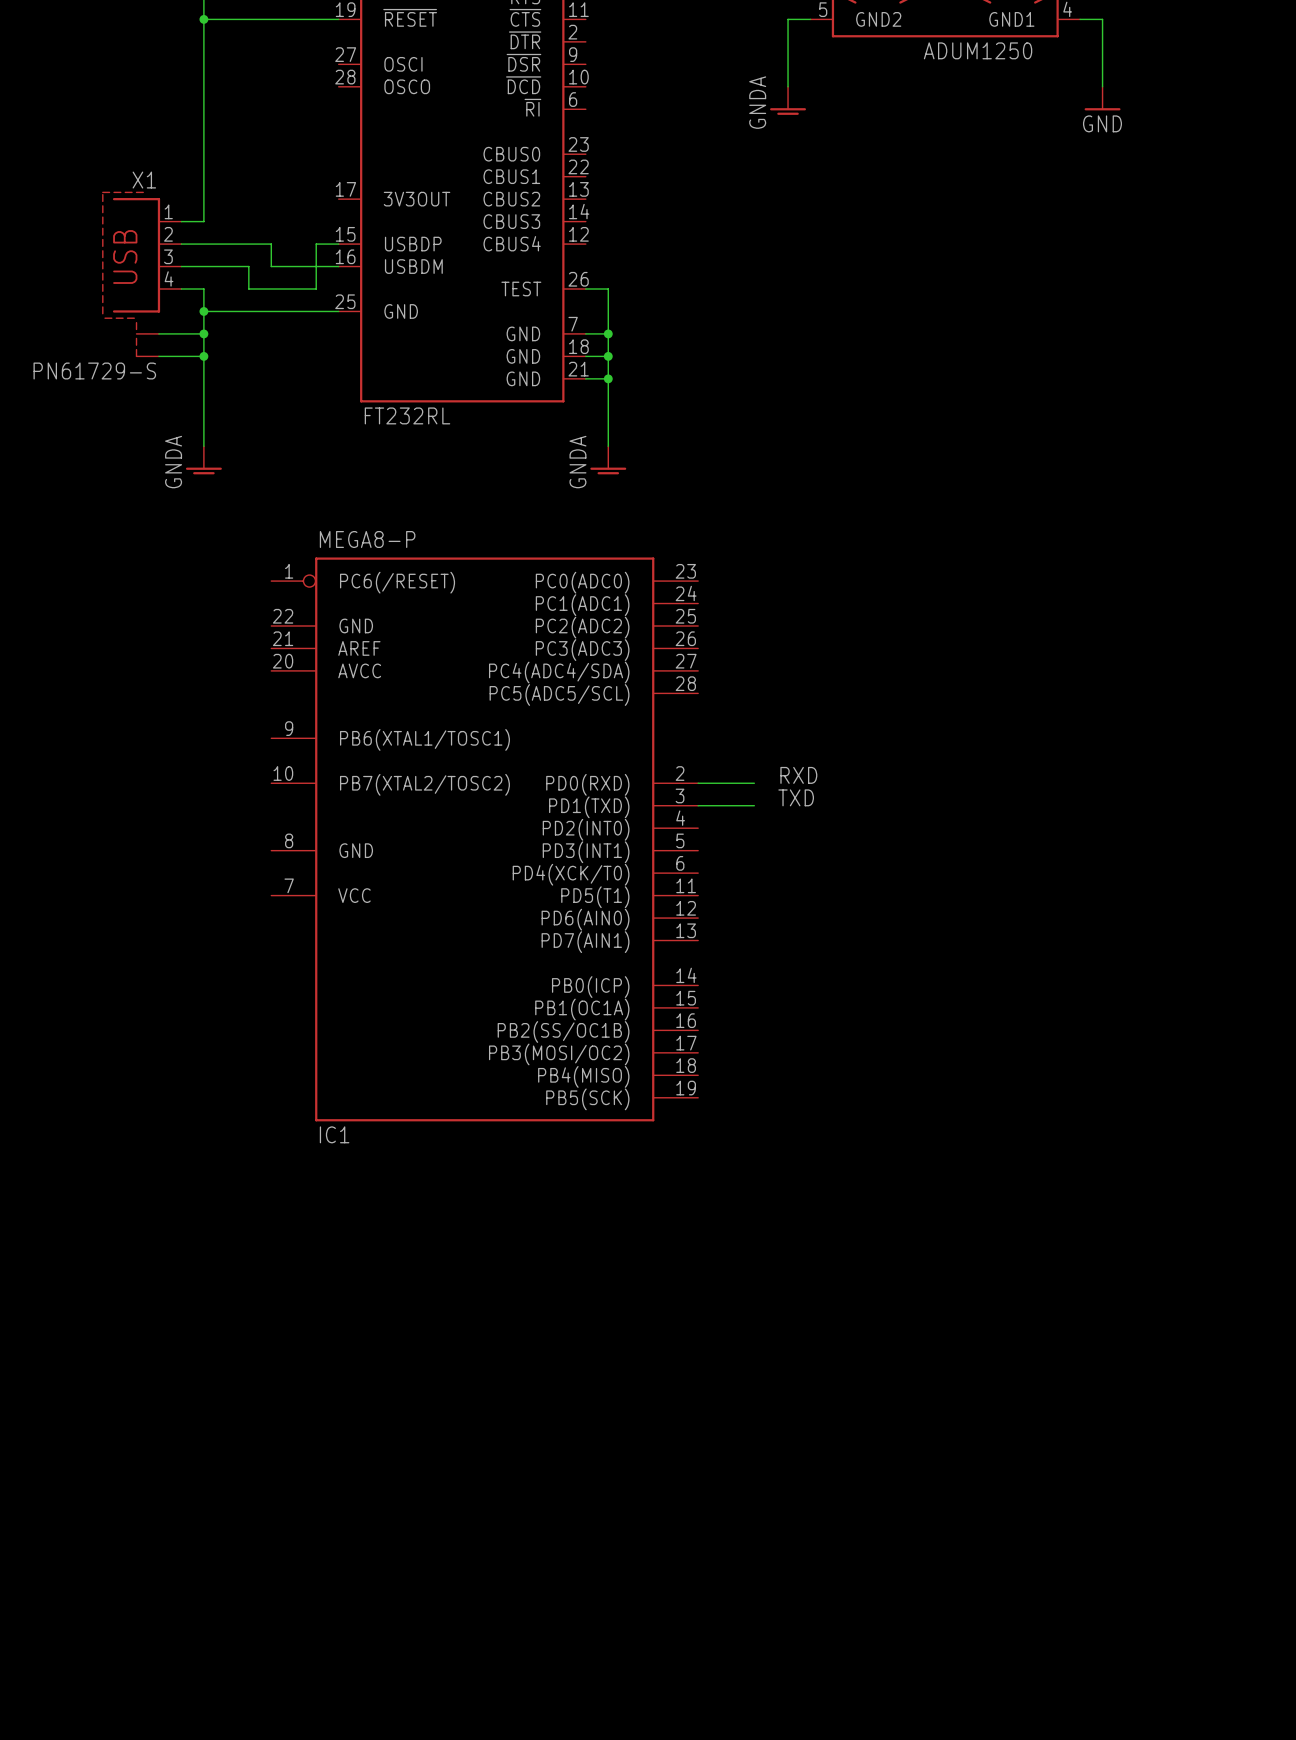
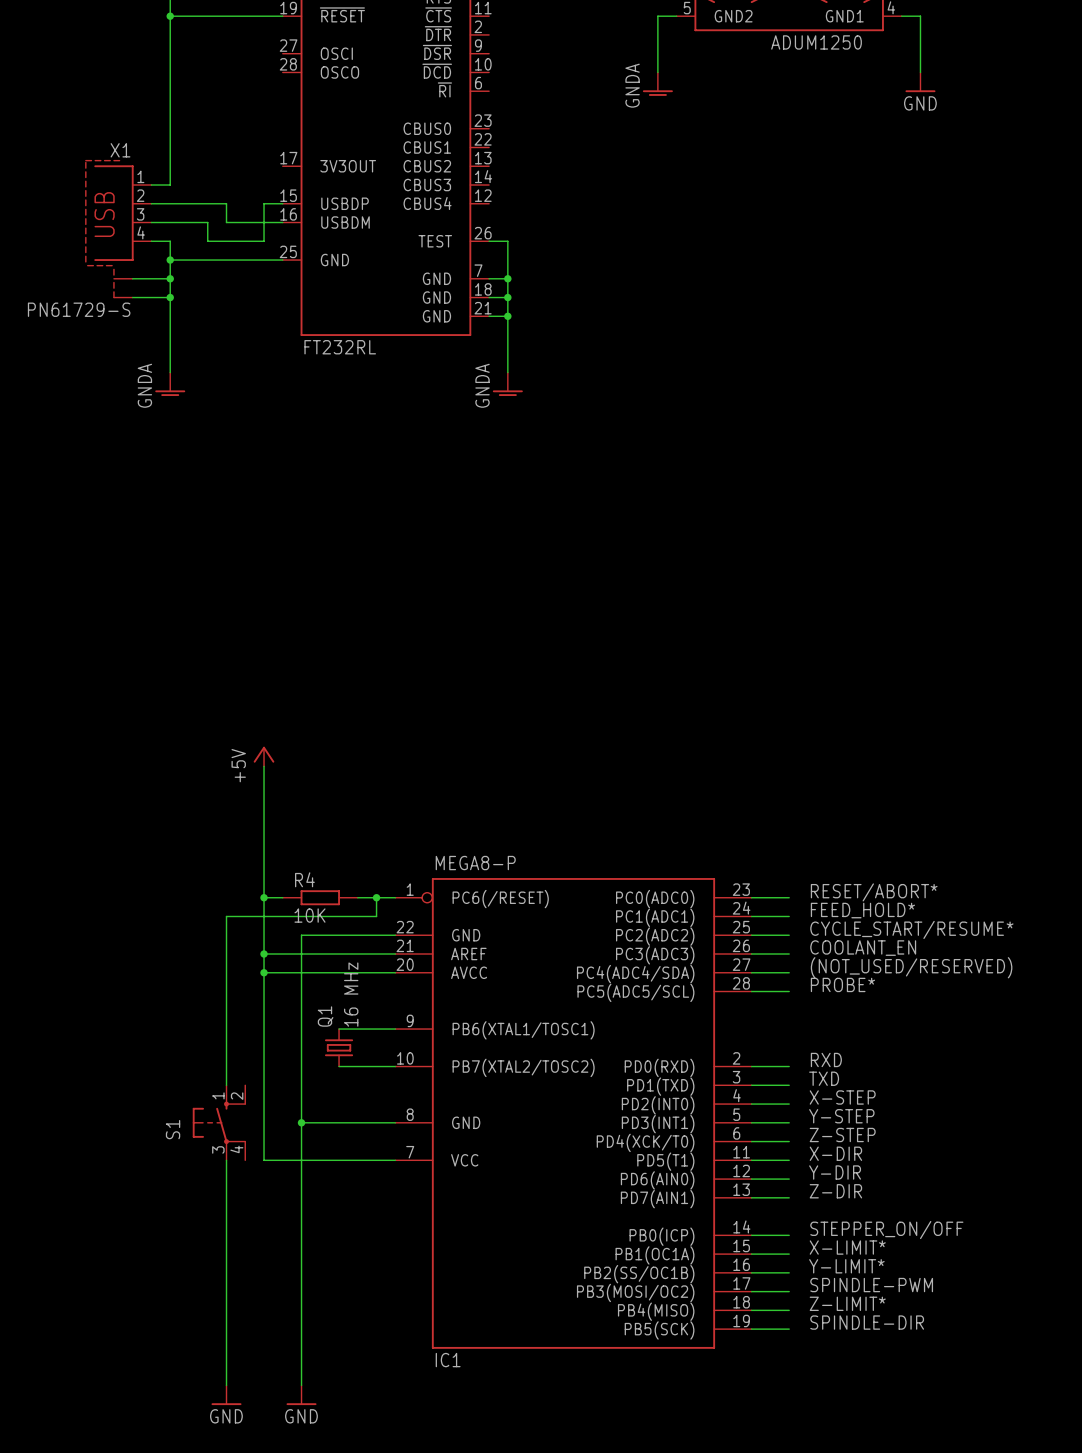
label: RXD (798, 775) -> none
wire: (698, 783) (754, 783) -> none
label: TXD (796, 797) -> none
wire: (698, 805) (754, 805) -> none
IC1 position: (484, 839) -> (573, 1113)
power symbol: none -> +5V (264, 756)
wire: none -> (264, 766) (264, 1160) (395, 1160)
label: none -> RESET/ABORT* (874, 892)
wire: none -> (264, 897) (282, 897)
junction: none -> (264, 897)
R4: none -> 10K (320, 897)
wire: none -> (357, 897) (395, 897)
wire: none -> (376, 897) (376, 916) (226, 916) (226, 1085)
junction: none -> (376, 897)
wire: none -> (751, 897) (789, 897)
label: none -> FEED_HOLD* (862, 910)
wire: none -> (751, 916) (789, 916)
label: none -> CYCLE_START/RESUME* (911, 929)
wire: none -> (395, 935) (301, 935) (301, 1385)
wire: none -> (751, 935) (789, 935)
label: none -> COOLANT_EN (863, 948)
wire: none -> (264, 954) (395, 954)
junction: none -> (264, 954)
wire: none -> (751, 954) (789, 954)
label: none -> (NOT_USED/RESERVED) (911, 967)
wire: none -> (264, 972) (395, 972)
junction: none -> (264, 972)
wire: none -> (751, 972) (789, 972)
label: none -> PROBE* (842, 984)
wire: none -> (751, 991) (789, 991)
wire: none -> (339, 1029) (395, 1029)
Q1: none -> 16 MHz (339, 1047)
label: none -> RXD (826, 1059)
wire: none -> (339, 1066) (395, 1066)
wire: none -> (751, 1066) (789, 1066)
label: none -> TXD (824, 1078)
wire: none -> (751, 1085) (789, 1085)
label: none -> X-STEP (842, 1097)
wire: none -> (751, 1104) (789, 1104)
label: none -> Y-STEP (841, 1116)
S1: none -> (219, 1122)
wire: none -> (301, 1122) (395, 1122)
junction: none -> (301, 1122)
wire: none -> (751, 1122) (789, 1122)
label: none -> Z-STEP (842, 1135)
wire: none -> (751, 1141) (789, 1141)
label: none -> X-DIR (835, 1153)
wire: none -> (226, 1160) (226, 1385)
wire: none -> (751, 1160) (789, 1160)
label: none -> Y-DIR (835, 1172)
wire: none -> (751, 1179) (789, 1179)
label: none -> Z-DIR (835, 1191)
wire: none -> (751, 1197) (789, 1197)
label: none -> STEPPER_ON/OFF (886, 1230)
wire: none -> (751, 1235) (789, 1235)
label: none -> X-LIMIT* (847, 1247)
wire: none -> (751, 1254) (789, 1254)
label: none -> Y-LIMIT* (846, 1266)
wire: none -> (751, 1272) (789, 1272)
label: none -> SPINDLE-PWM (871, 1285)
wire: none -> (751, 1291) (789, 1291)
label: none -> Z-LIMIT* (847, 1303)
wire: none -> (751, 1310) (789, 1310)
label: none -> SPINDLE-DIR (867, 1322)
wire: none -> (751, 1329) (789, 1329)
power symbol: none -> GND (226, 1395)
power symbol: none -> GND (301, 1395)

